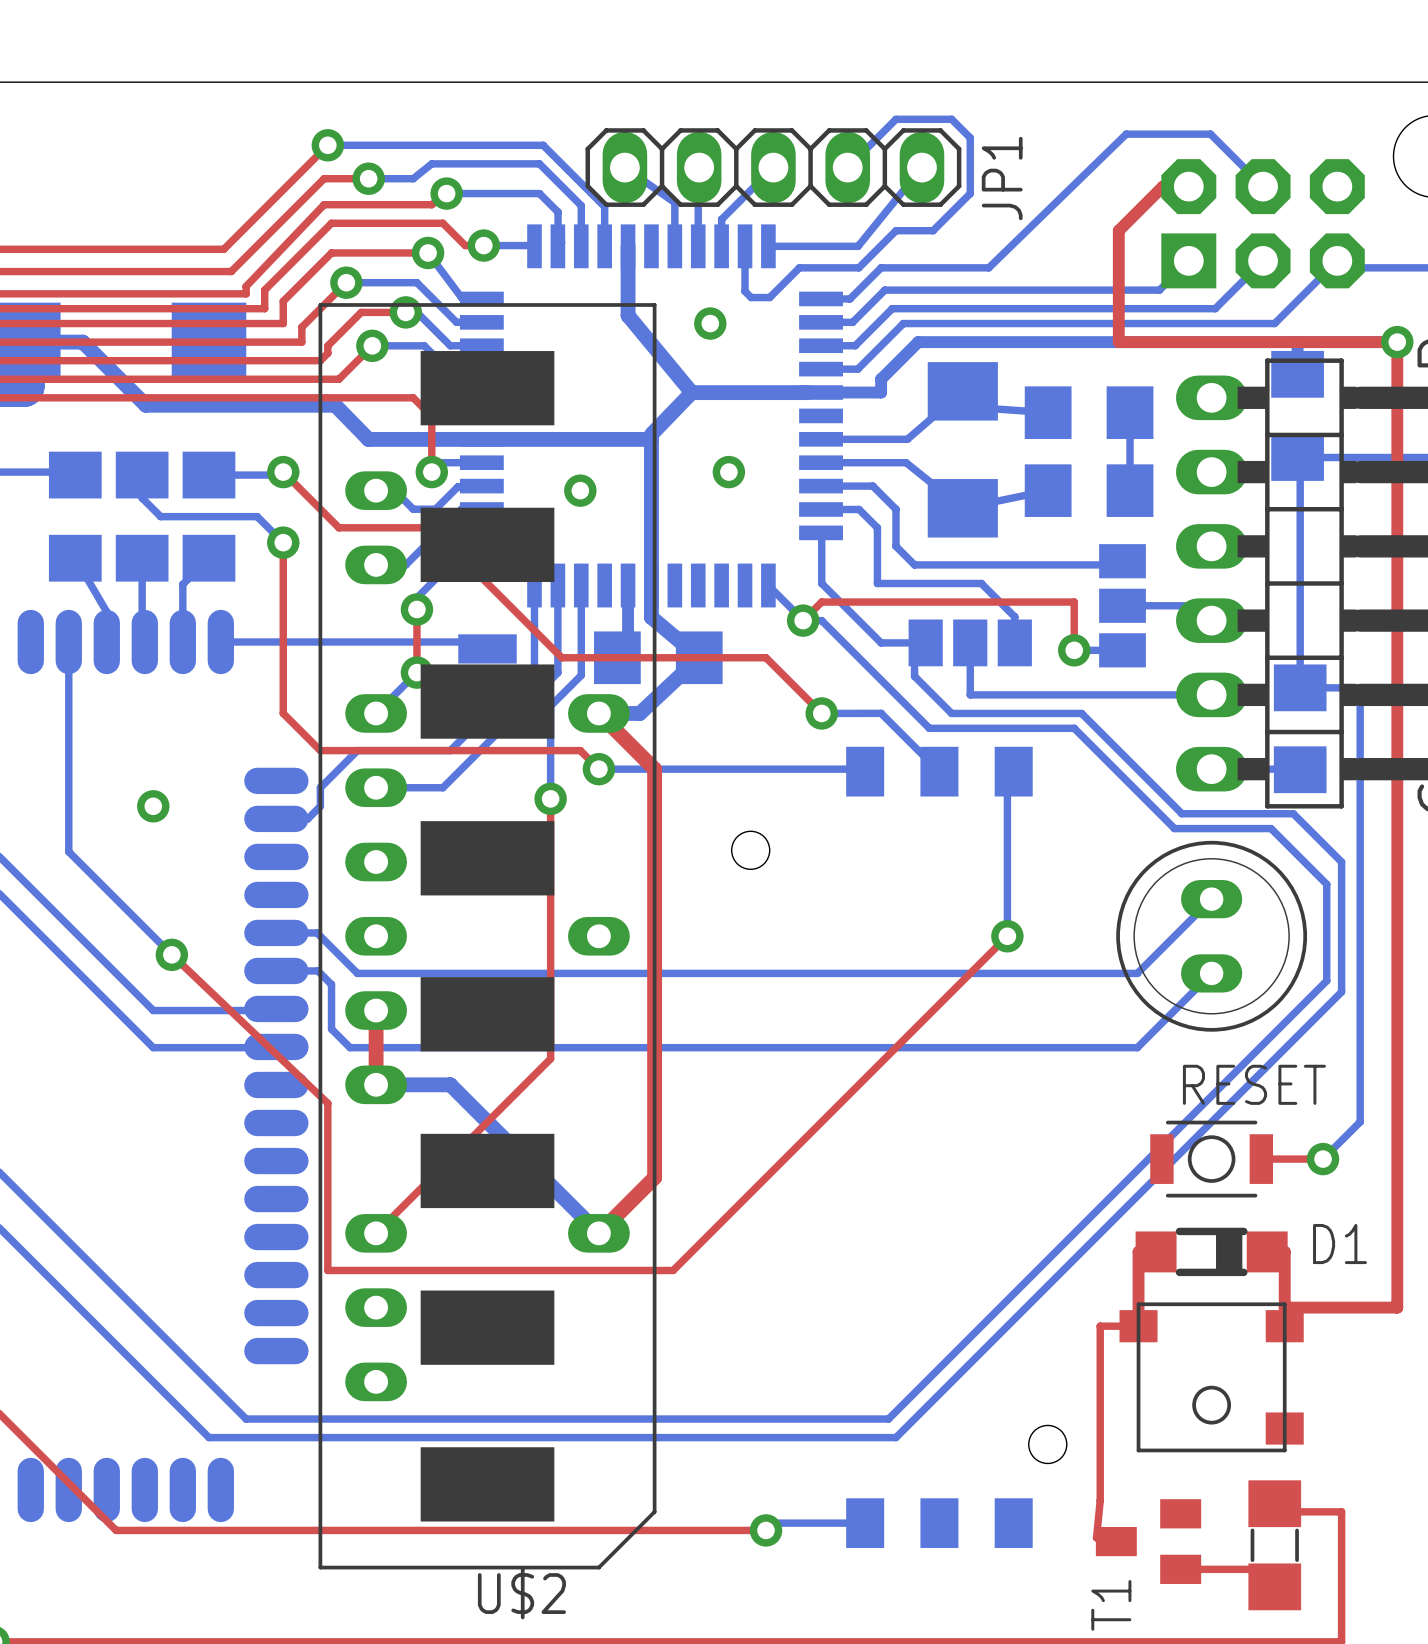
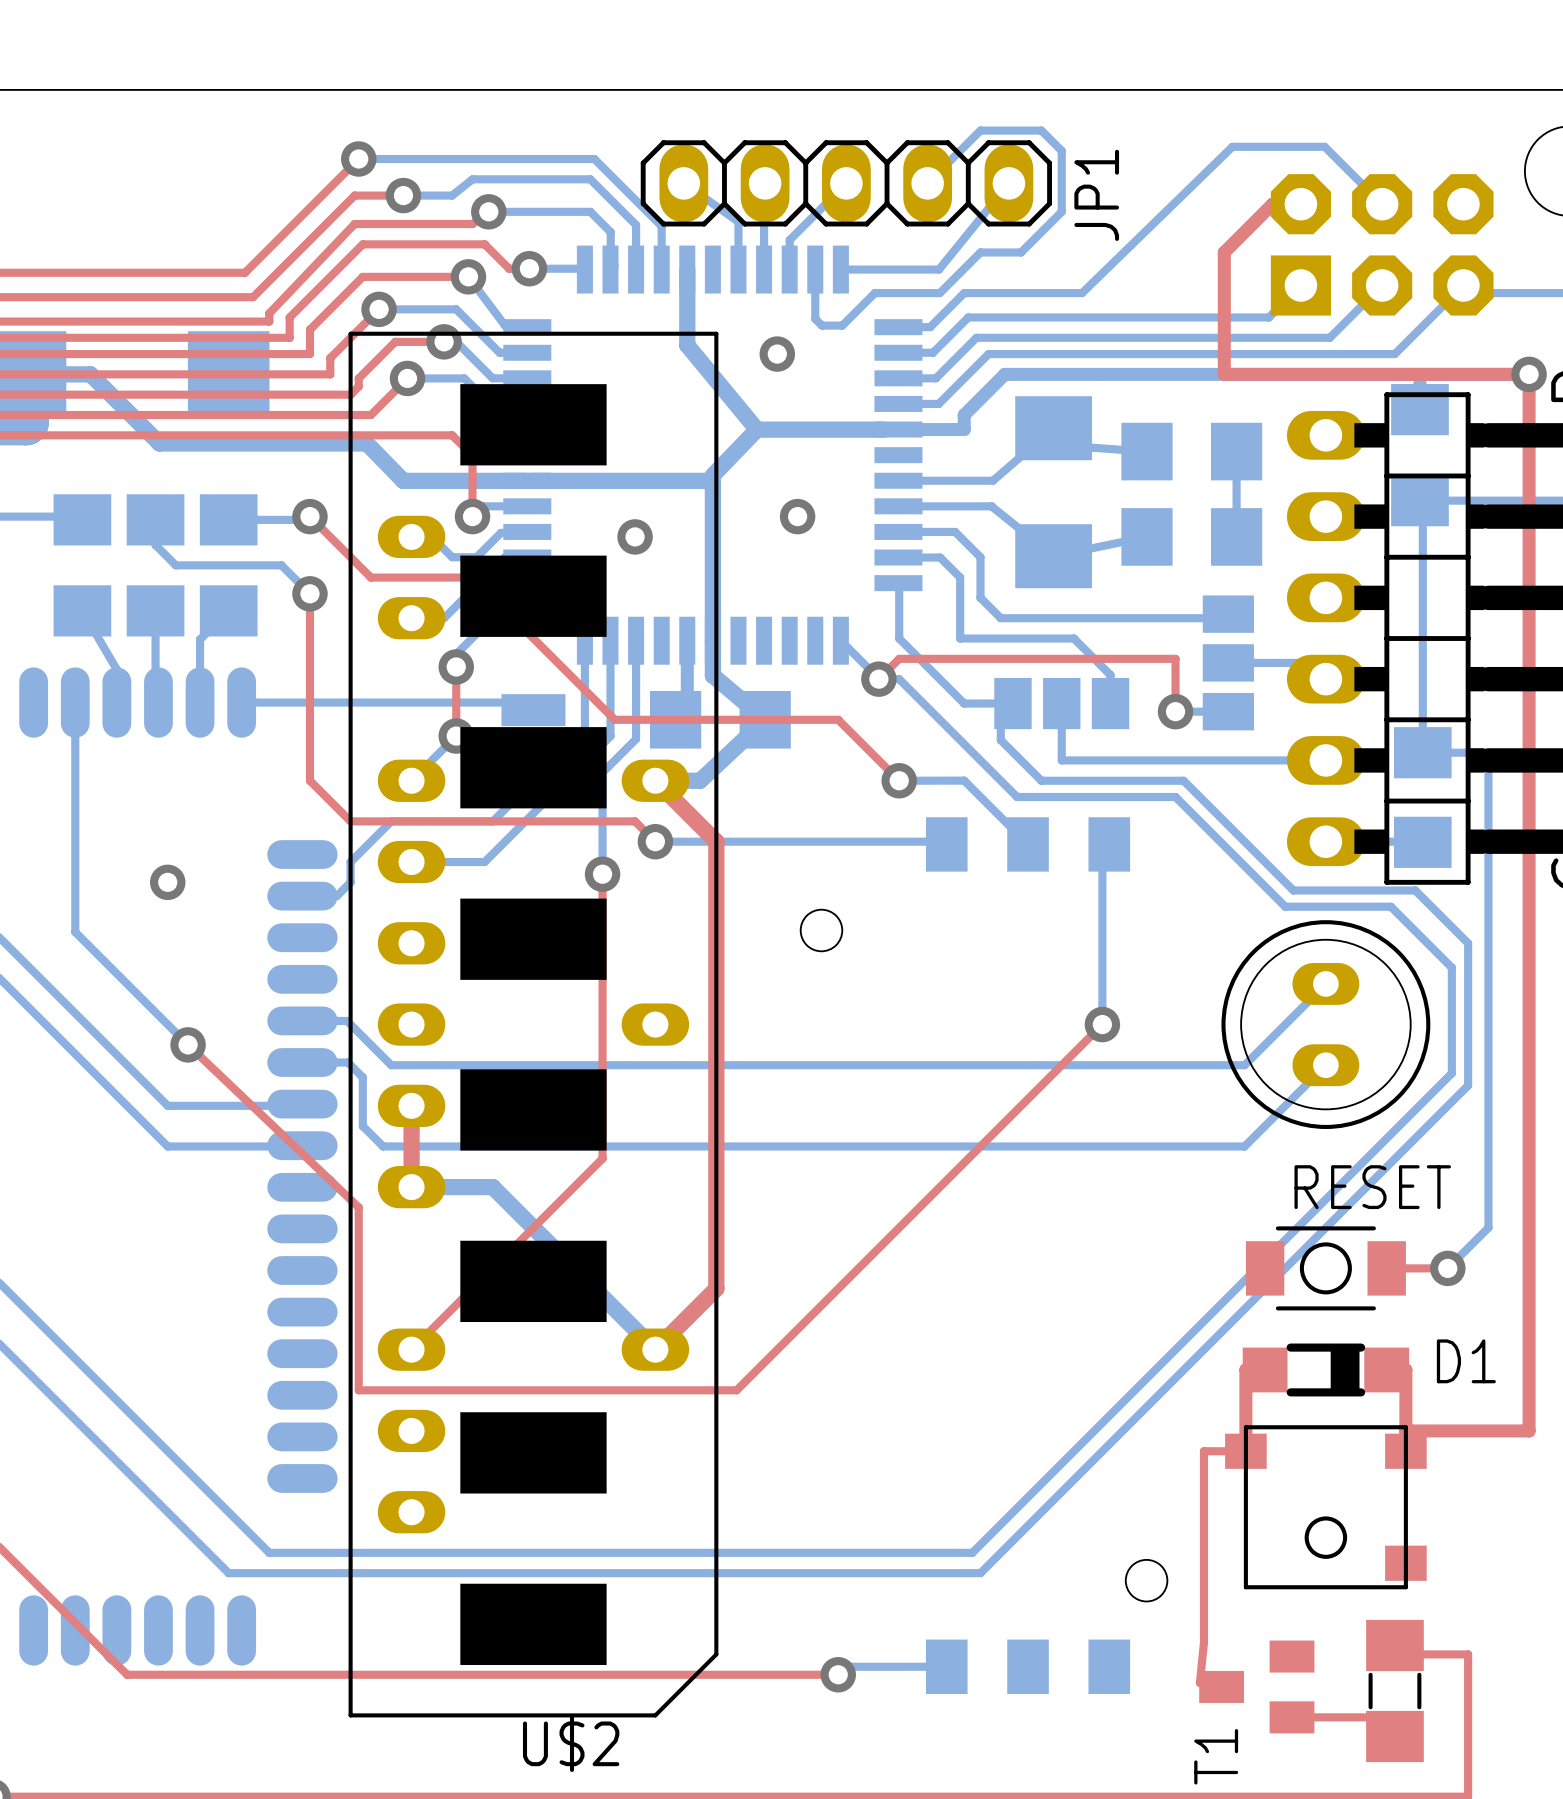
RESET footprint: [1150, 1120, 1274, 1198] -> [1245, 1226, 1406, 1311]

